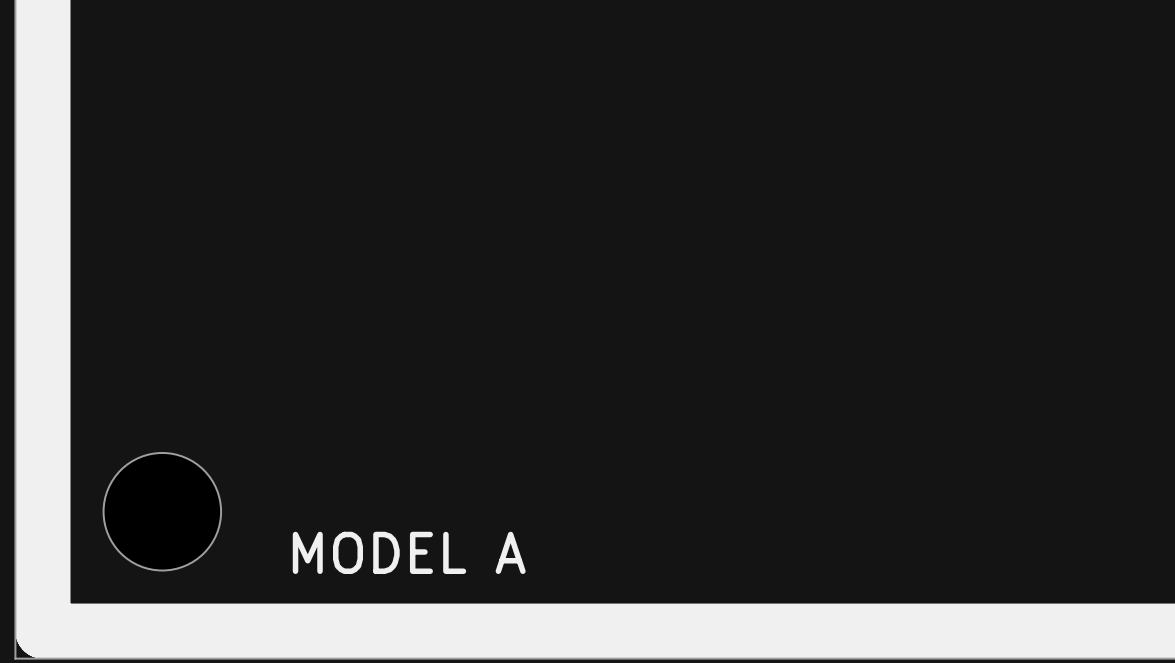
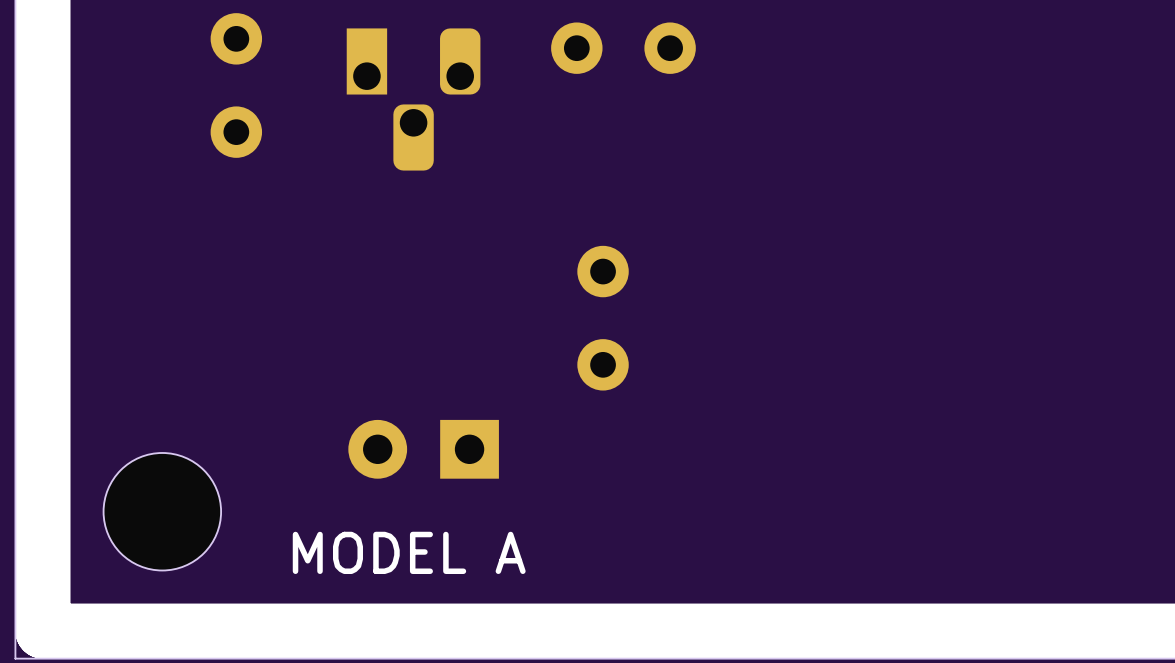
part: none -> (623, 48)
part: none -> (236, 85)
part: none -> (413, 99)
part: none -> (603, 318)
part: none -> (423, 449)

